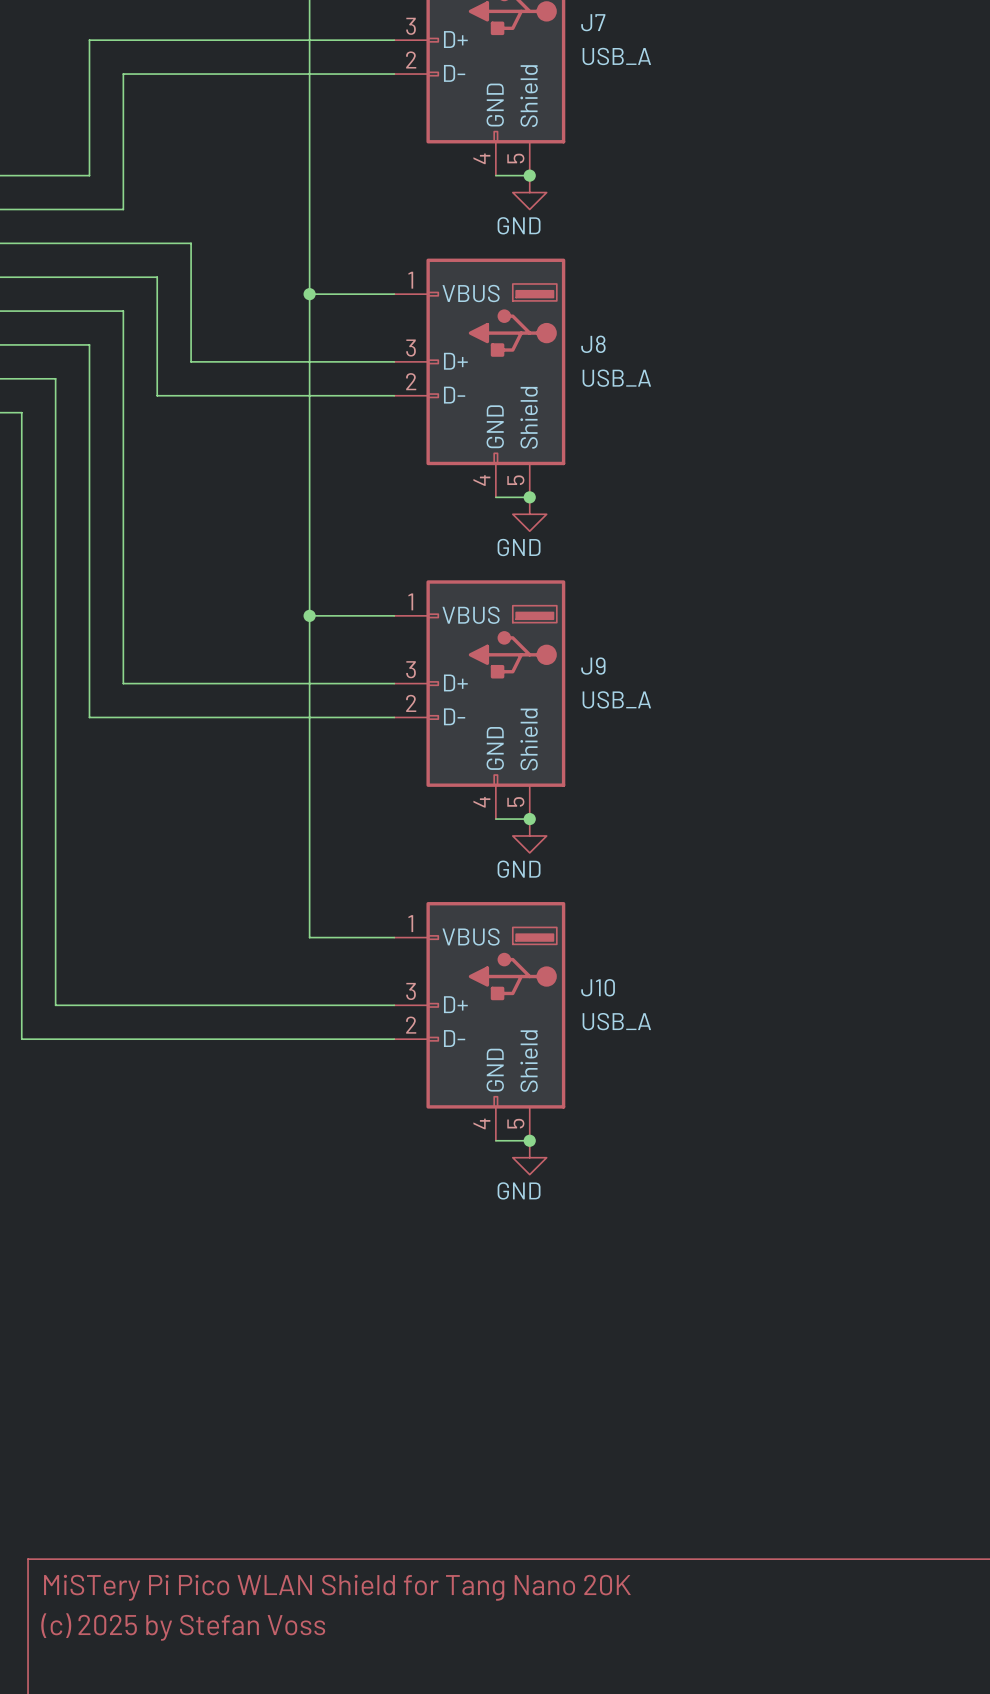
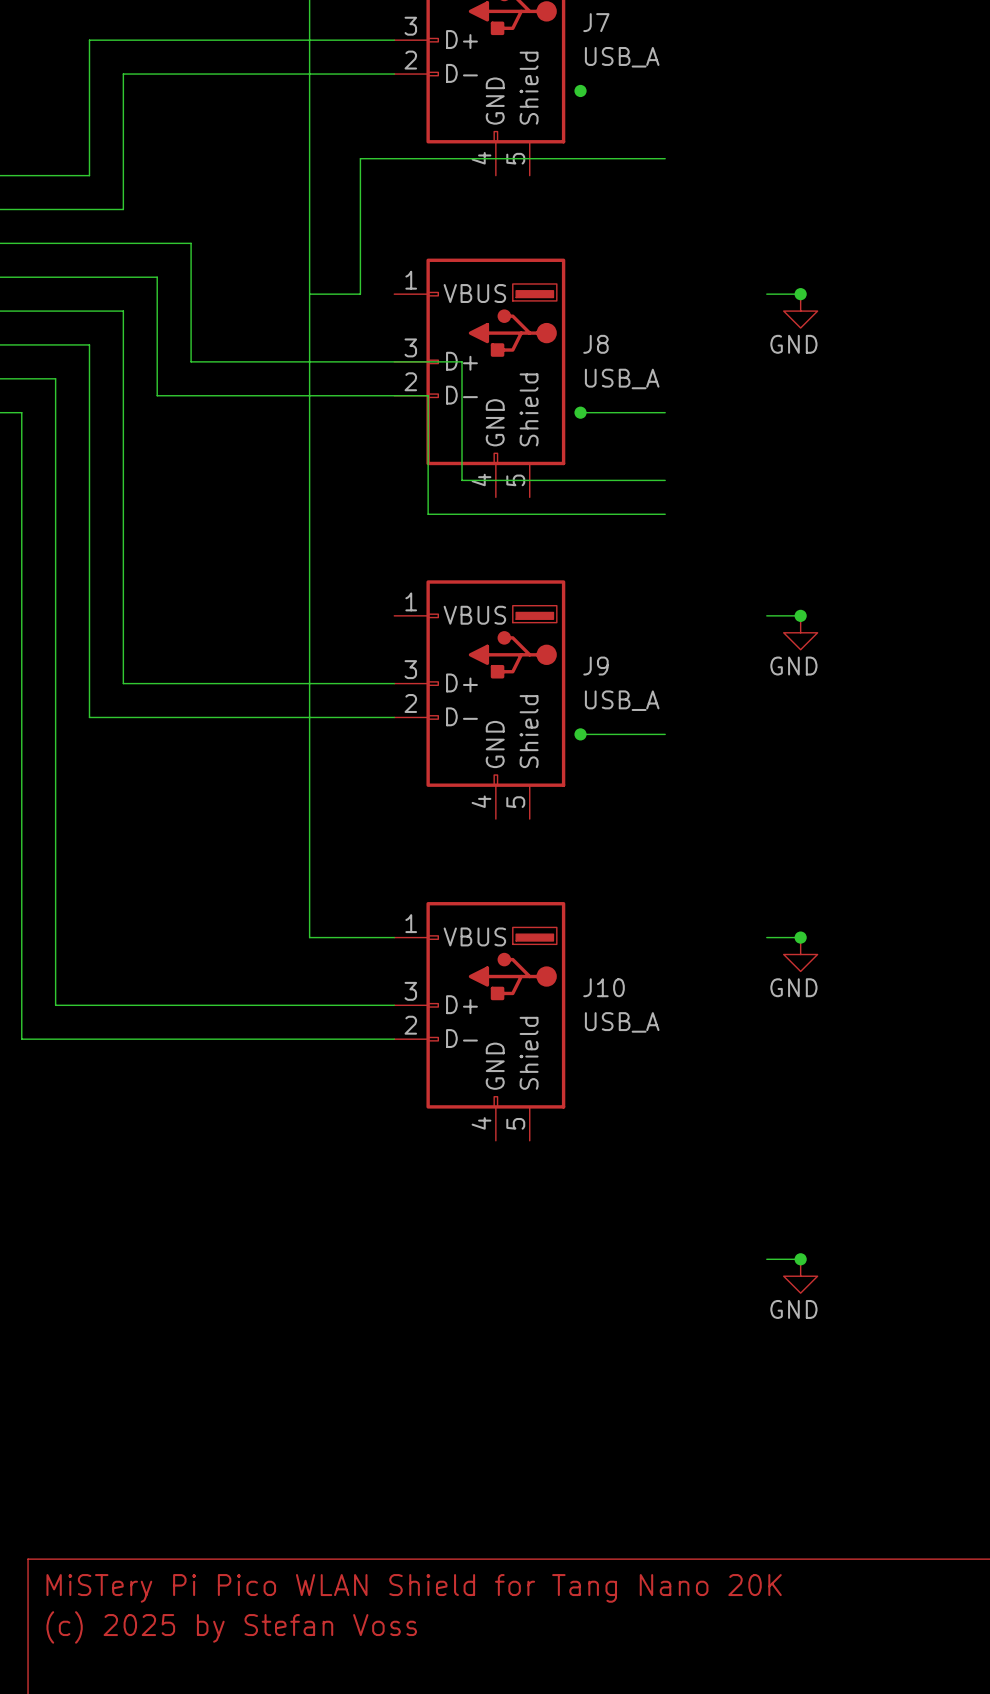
junction: none -> (580, 90)
wire: (495, 175) (529, 175) -> (766, 294) (800, 294)
junction: (529, 175) -> none
power symbol: GND (529, 192) -> none
junction: (309, 294) -> none
wire: (360, 294) (394, 294) -> (360, 294) (360, 158) (665, 158)
junction: none -> (800, 294)
power symbol: none -> GND (800, 311)
wire: none -> (394, 361) (462, 361) (462, 480) (665, 480)
wire: none -> (394, 395) (428, 395) (428, 514) (665, 514)
wire: none -> (580, 412) (665, 412)
junction: none -> (580, 412)
wire: (495, 497) (529, 497) -> (766, 615) (800, 615)
junction: (529, 497) -> none
power symbol: GND (529, 514) -> none
wire: (309, 615) (394, 615) -> (580, 734) (665, 734)
junction: (309, 615) -> none
junction: none -> (800, 615)
power symbol: none -> GND (800, 632)
junction: none -> (580, 734)
wire: (495, 819) (529, 819) -> (766, 937) (800, 937)
junction: (529, 819) -> none
power symbol: GND (529, 835) -> none
junction: none -> (800, 937)
power symbol: none -> GND (800, 954)
wire: (495, 1140) (529, 1140) -> (766, 1259) (800, 1259)
junction: (529, 1140) -> none
power symbol: GND (529, 1157) -> none
junction: none -> (800, 1259)
power symbol: none -> GND (800, 1276)

